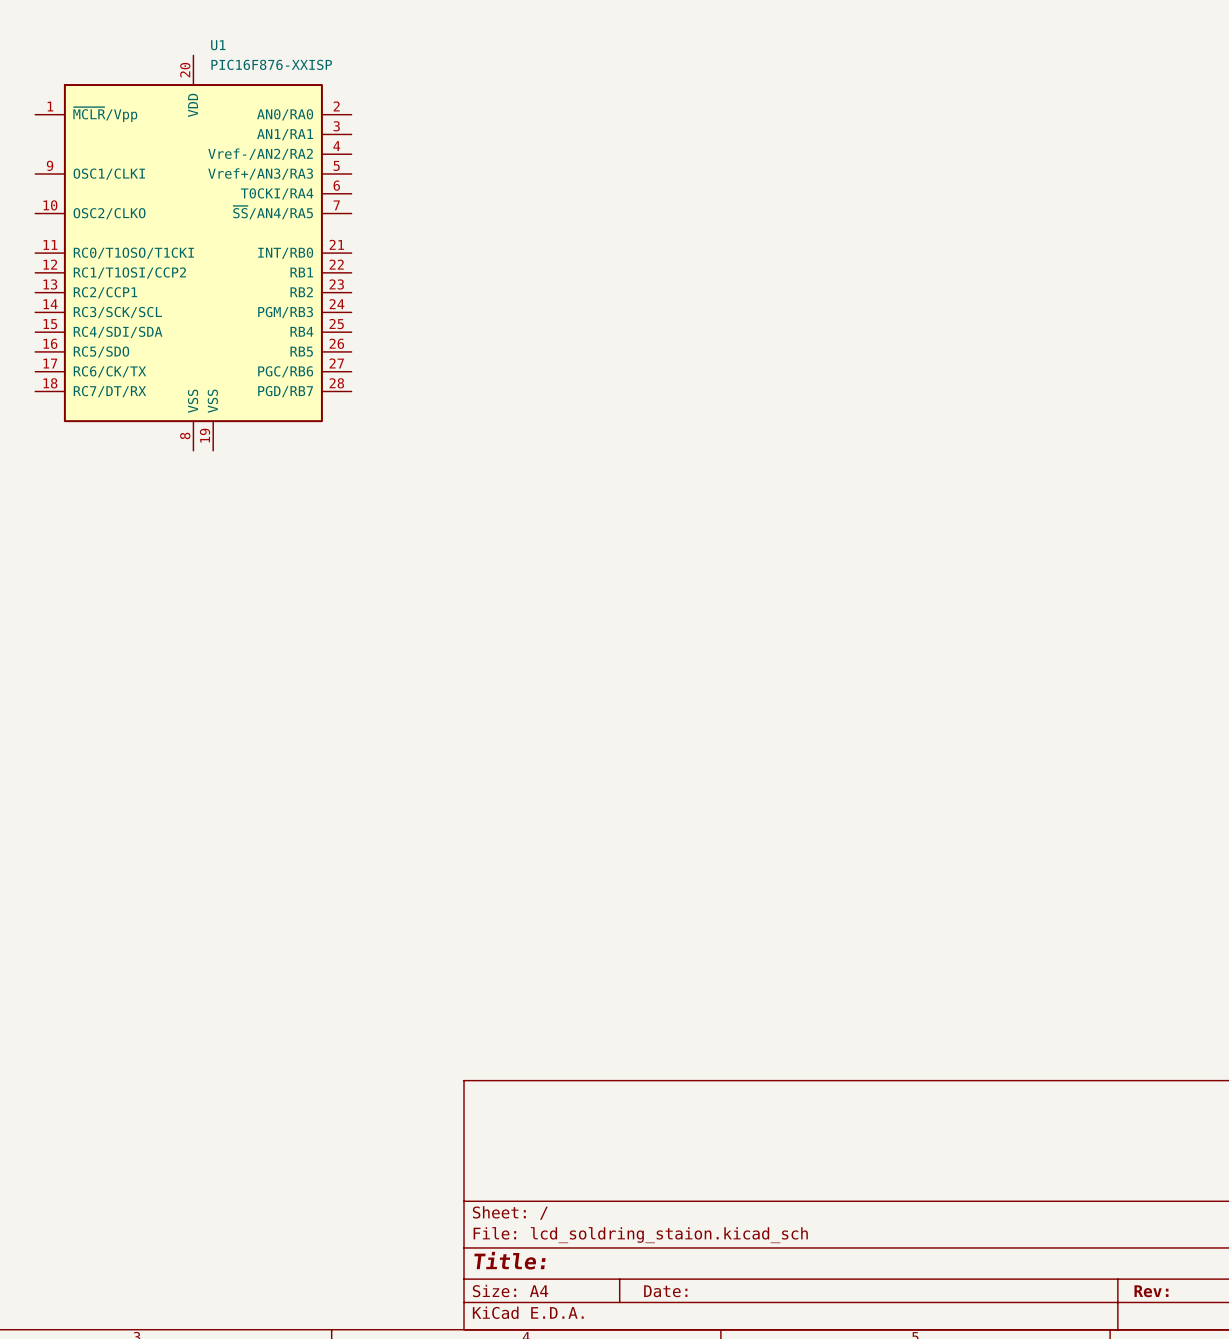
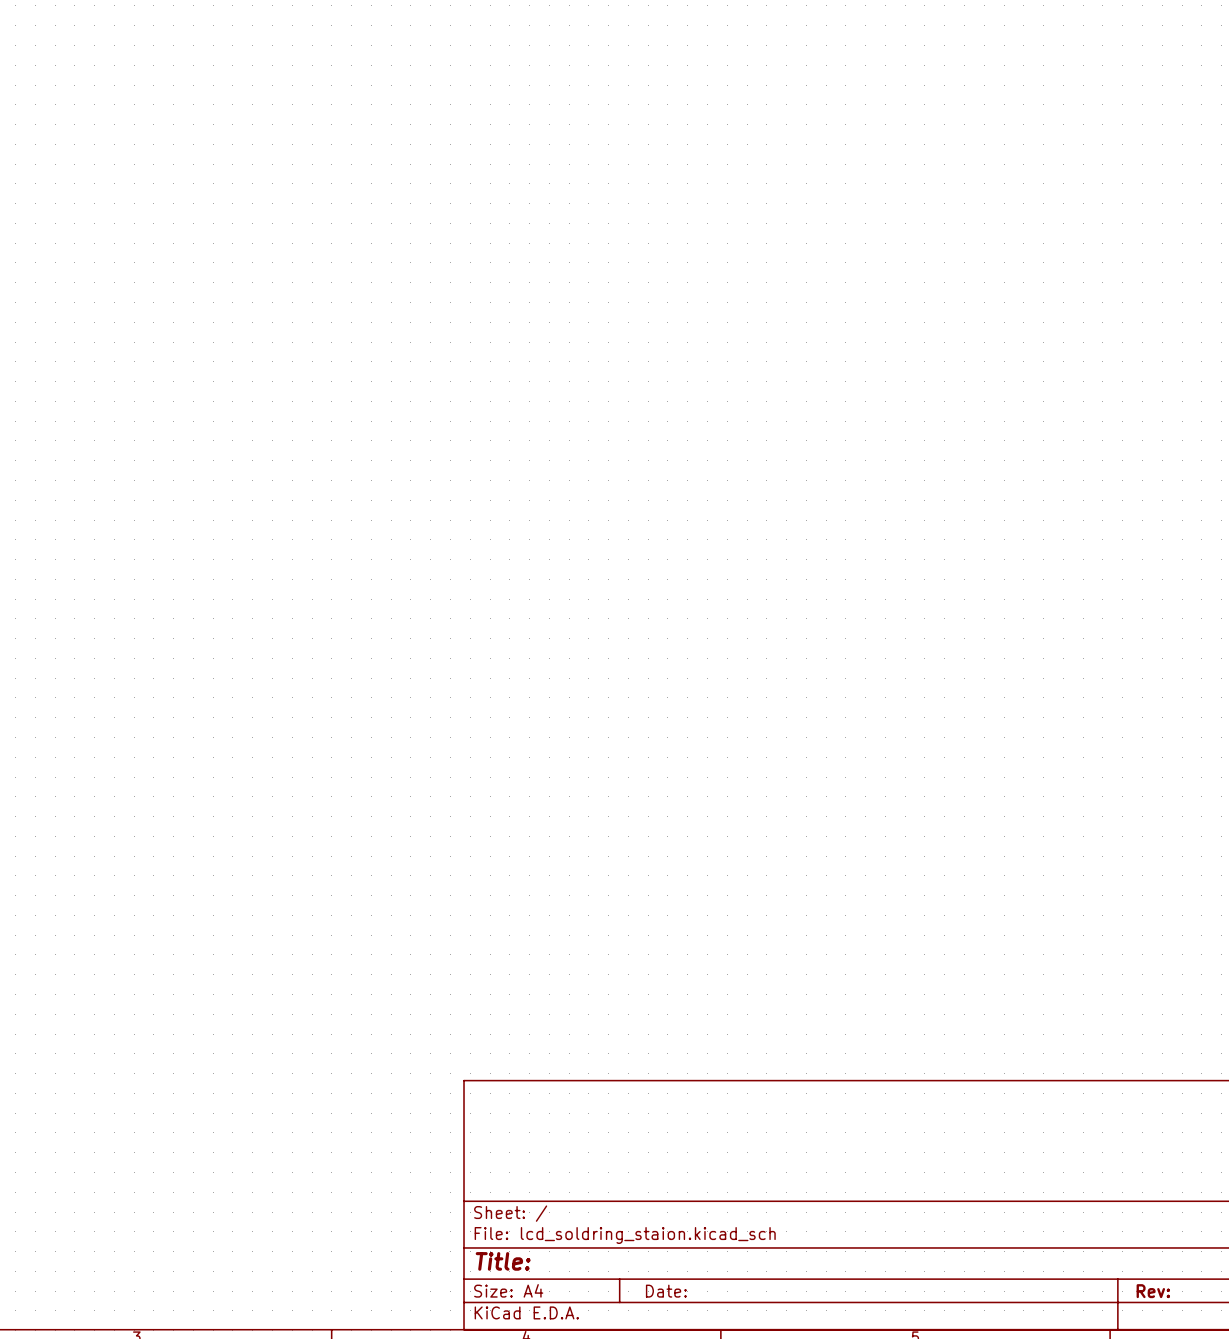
U1: PIC16F876-XXISP (193, 253) -> none

